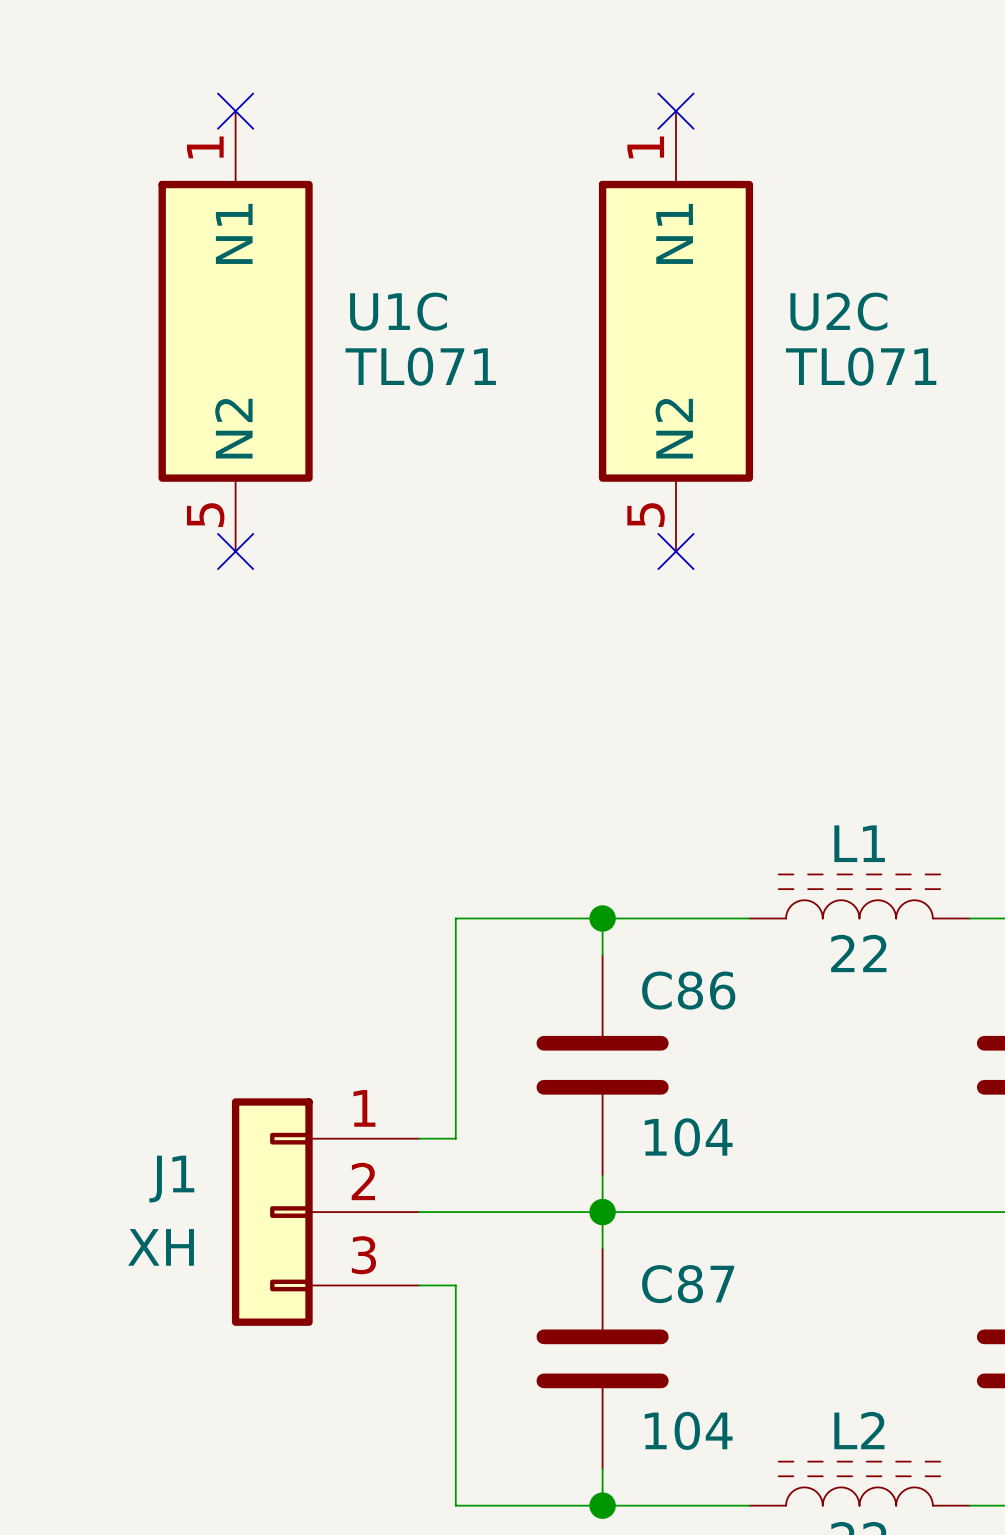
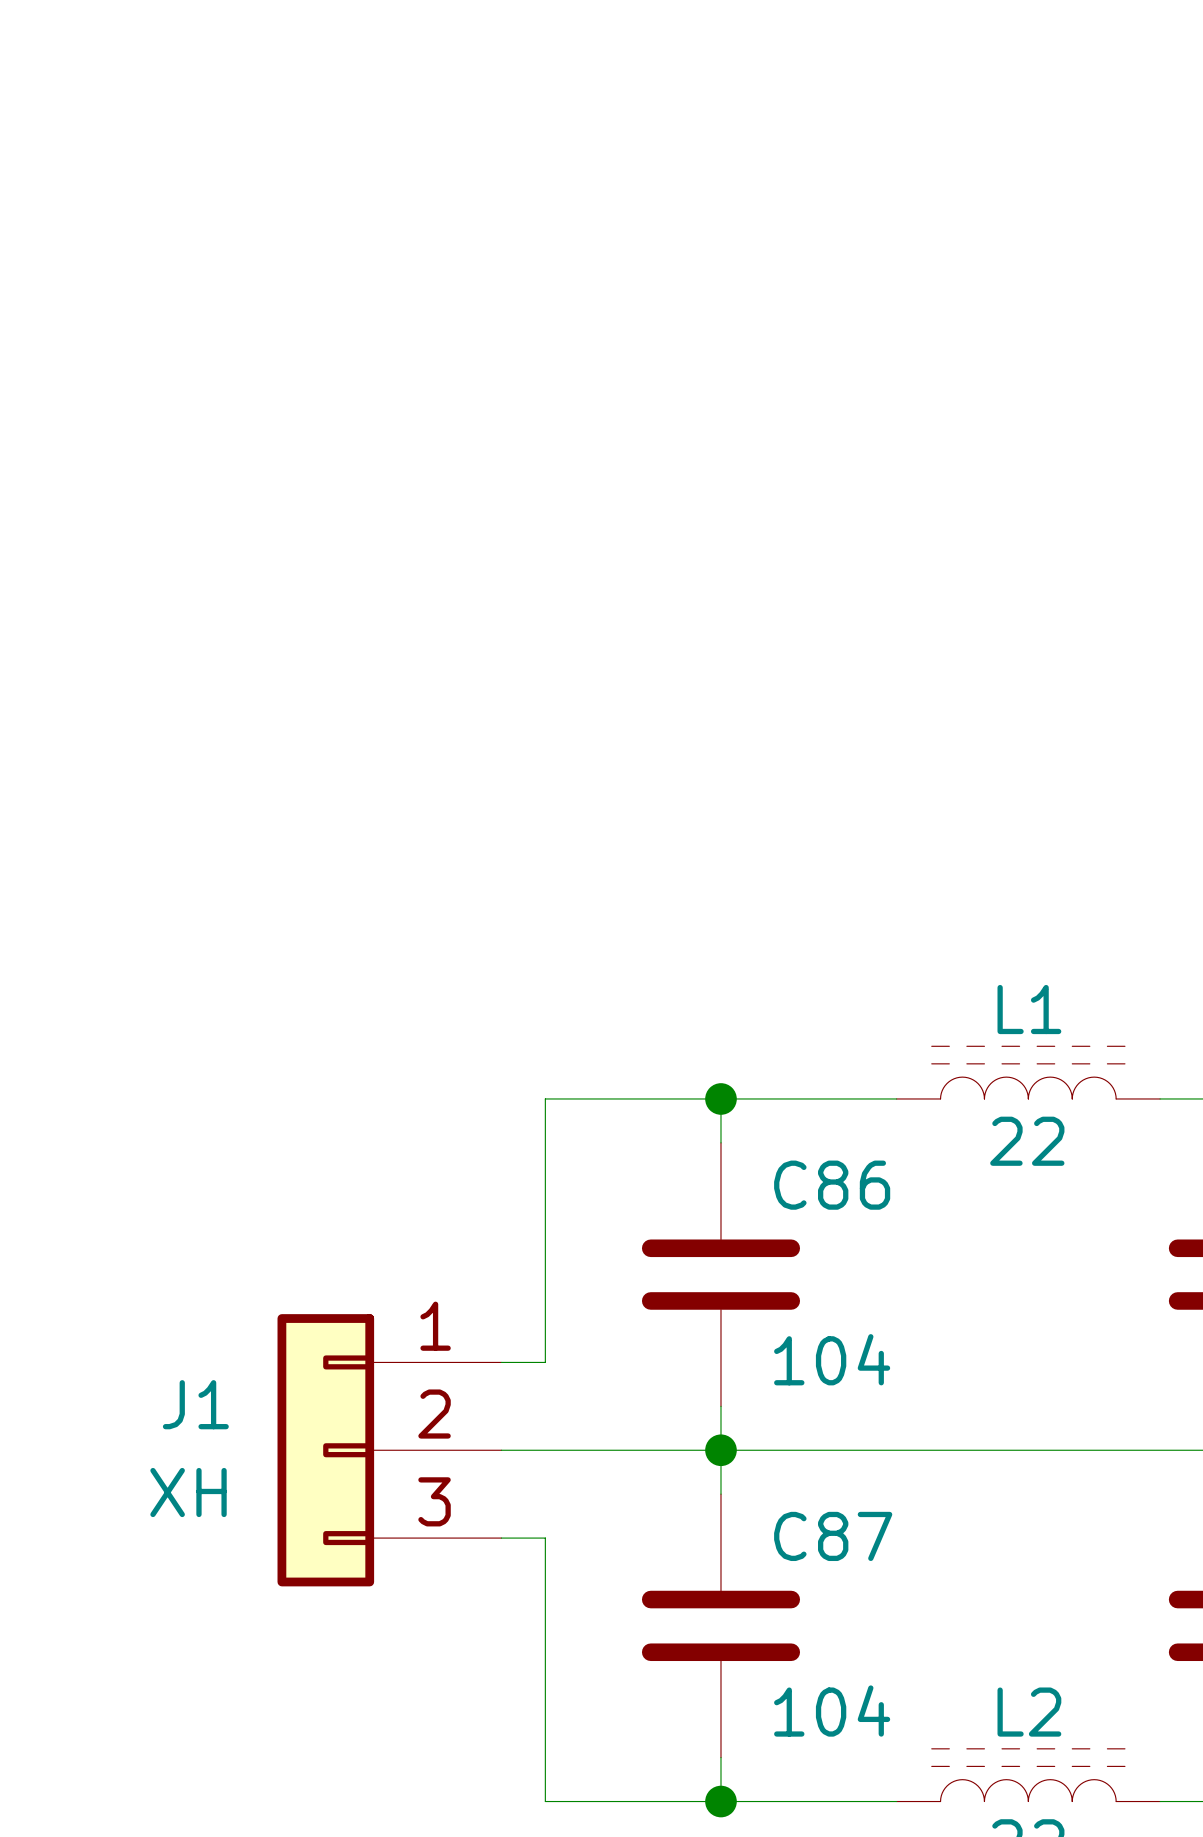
no-connect mark: (235, 111) -> none
no-connect mark: (675, 111) -> none
U1C: TL071 (235, 331) -> none
U2C: TL071 (675, 331) -> none
no-connect mark: (235, 551) -> none
no-connect mark: (675, 551) -> none

